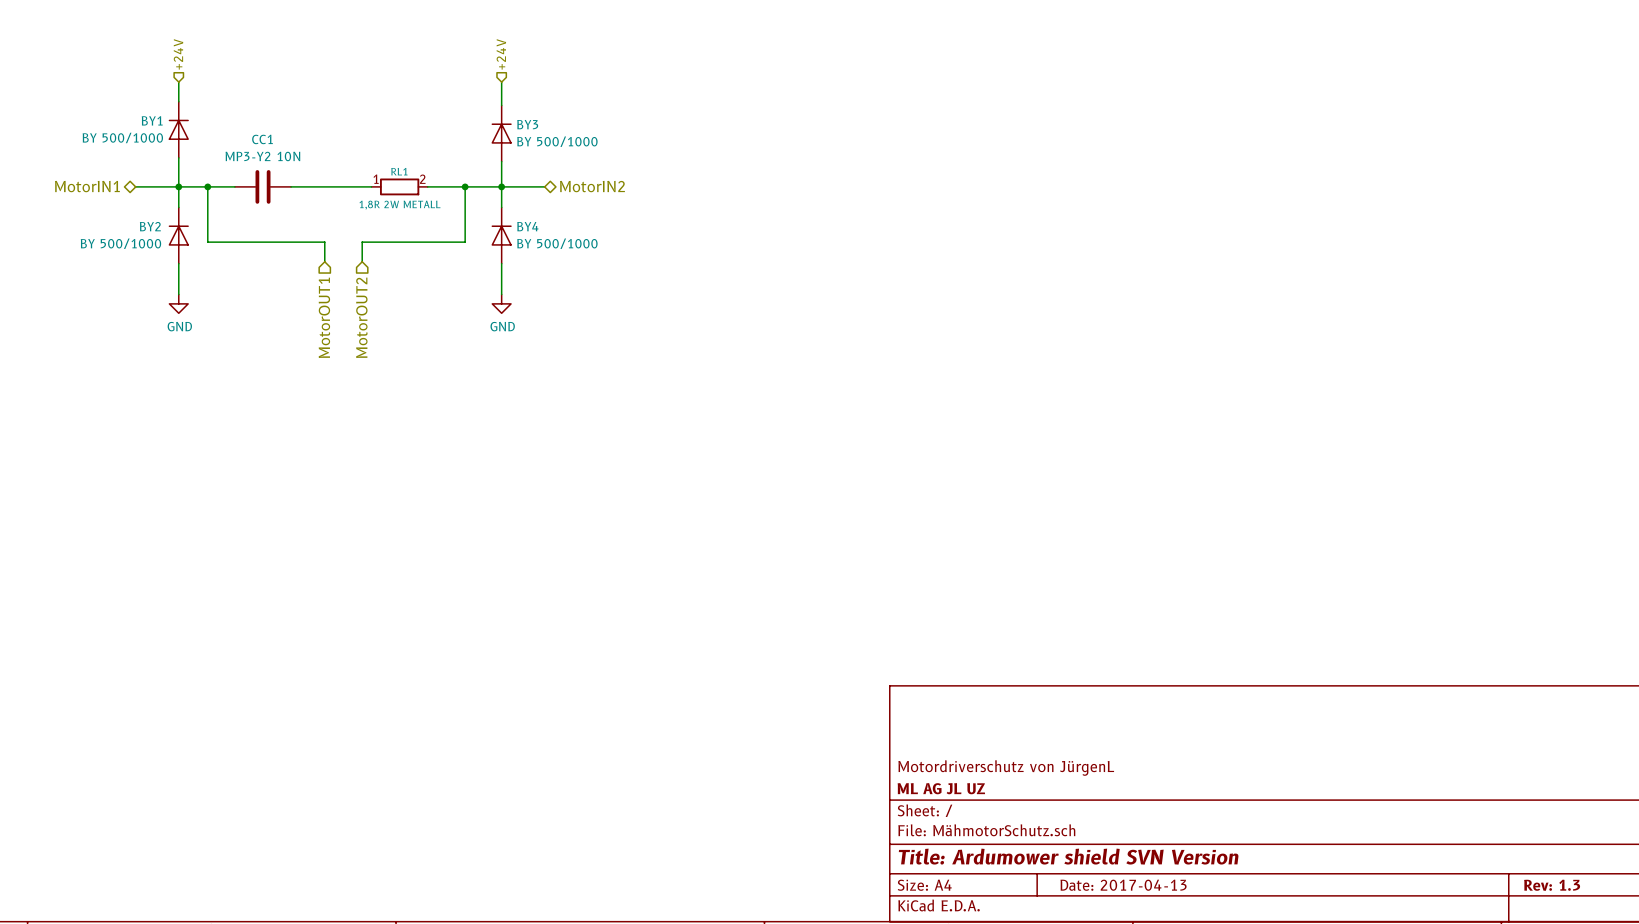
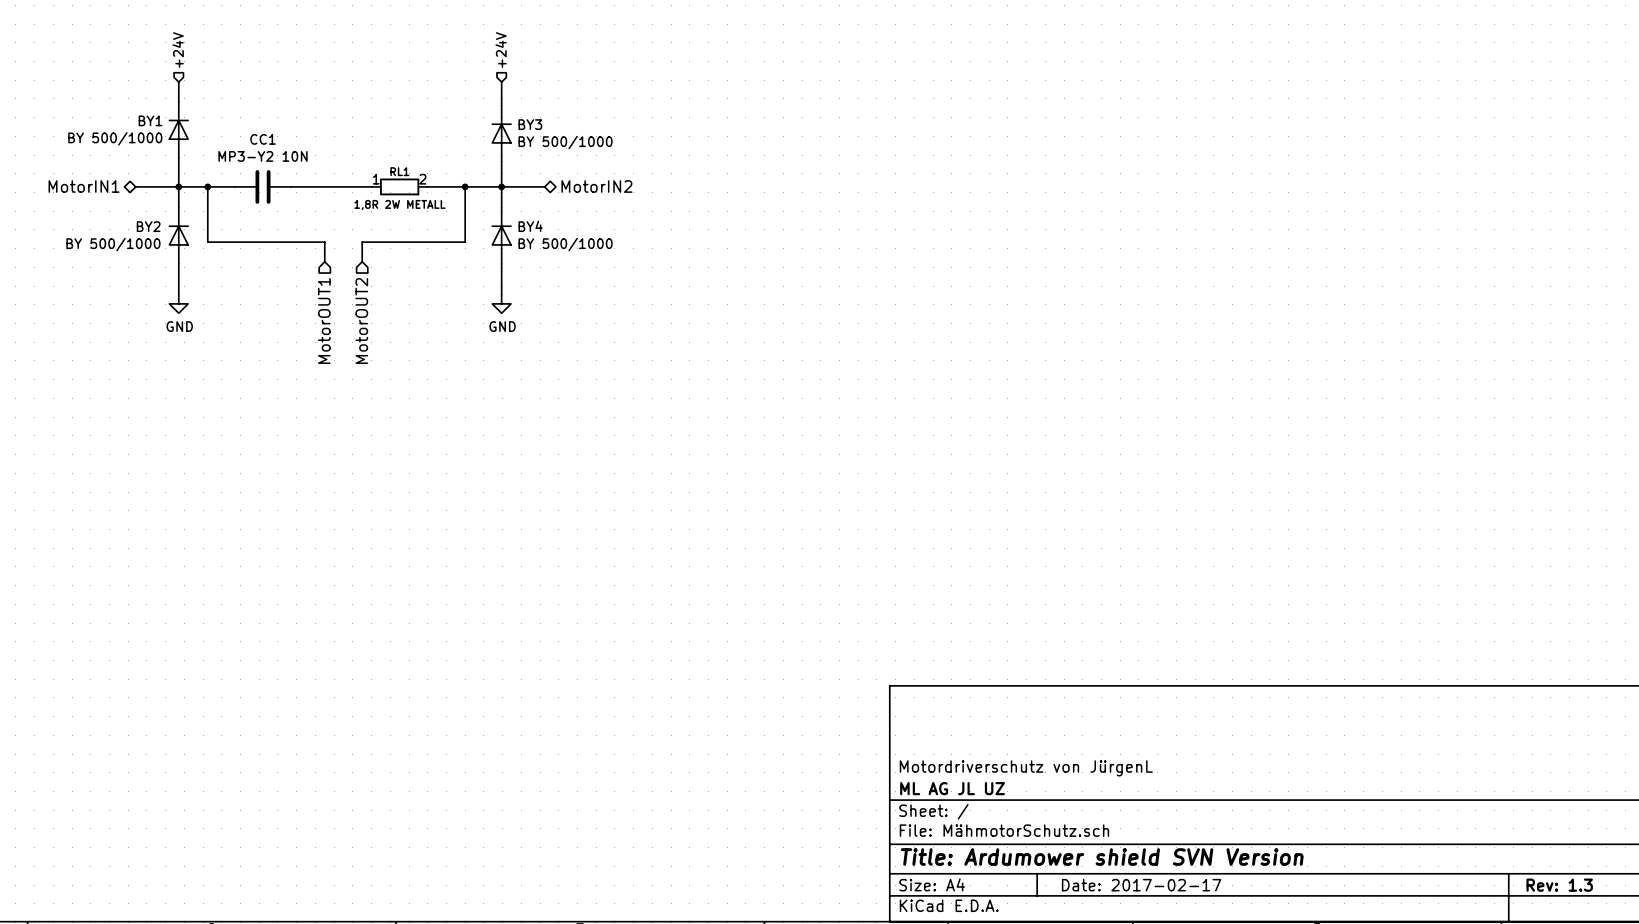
title block: Date: 2017-04-13 (1123, 885) -> Date: 2017-02-17 (1141, 885)

